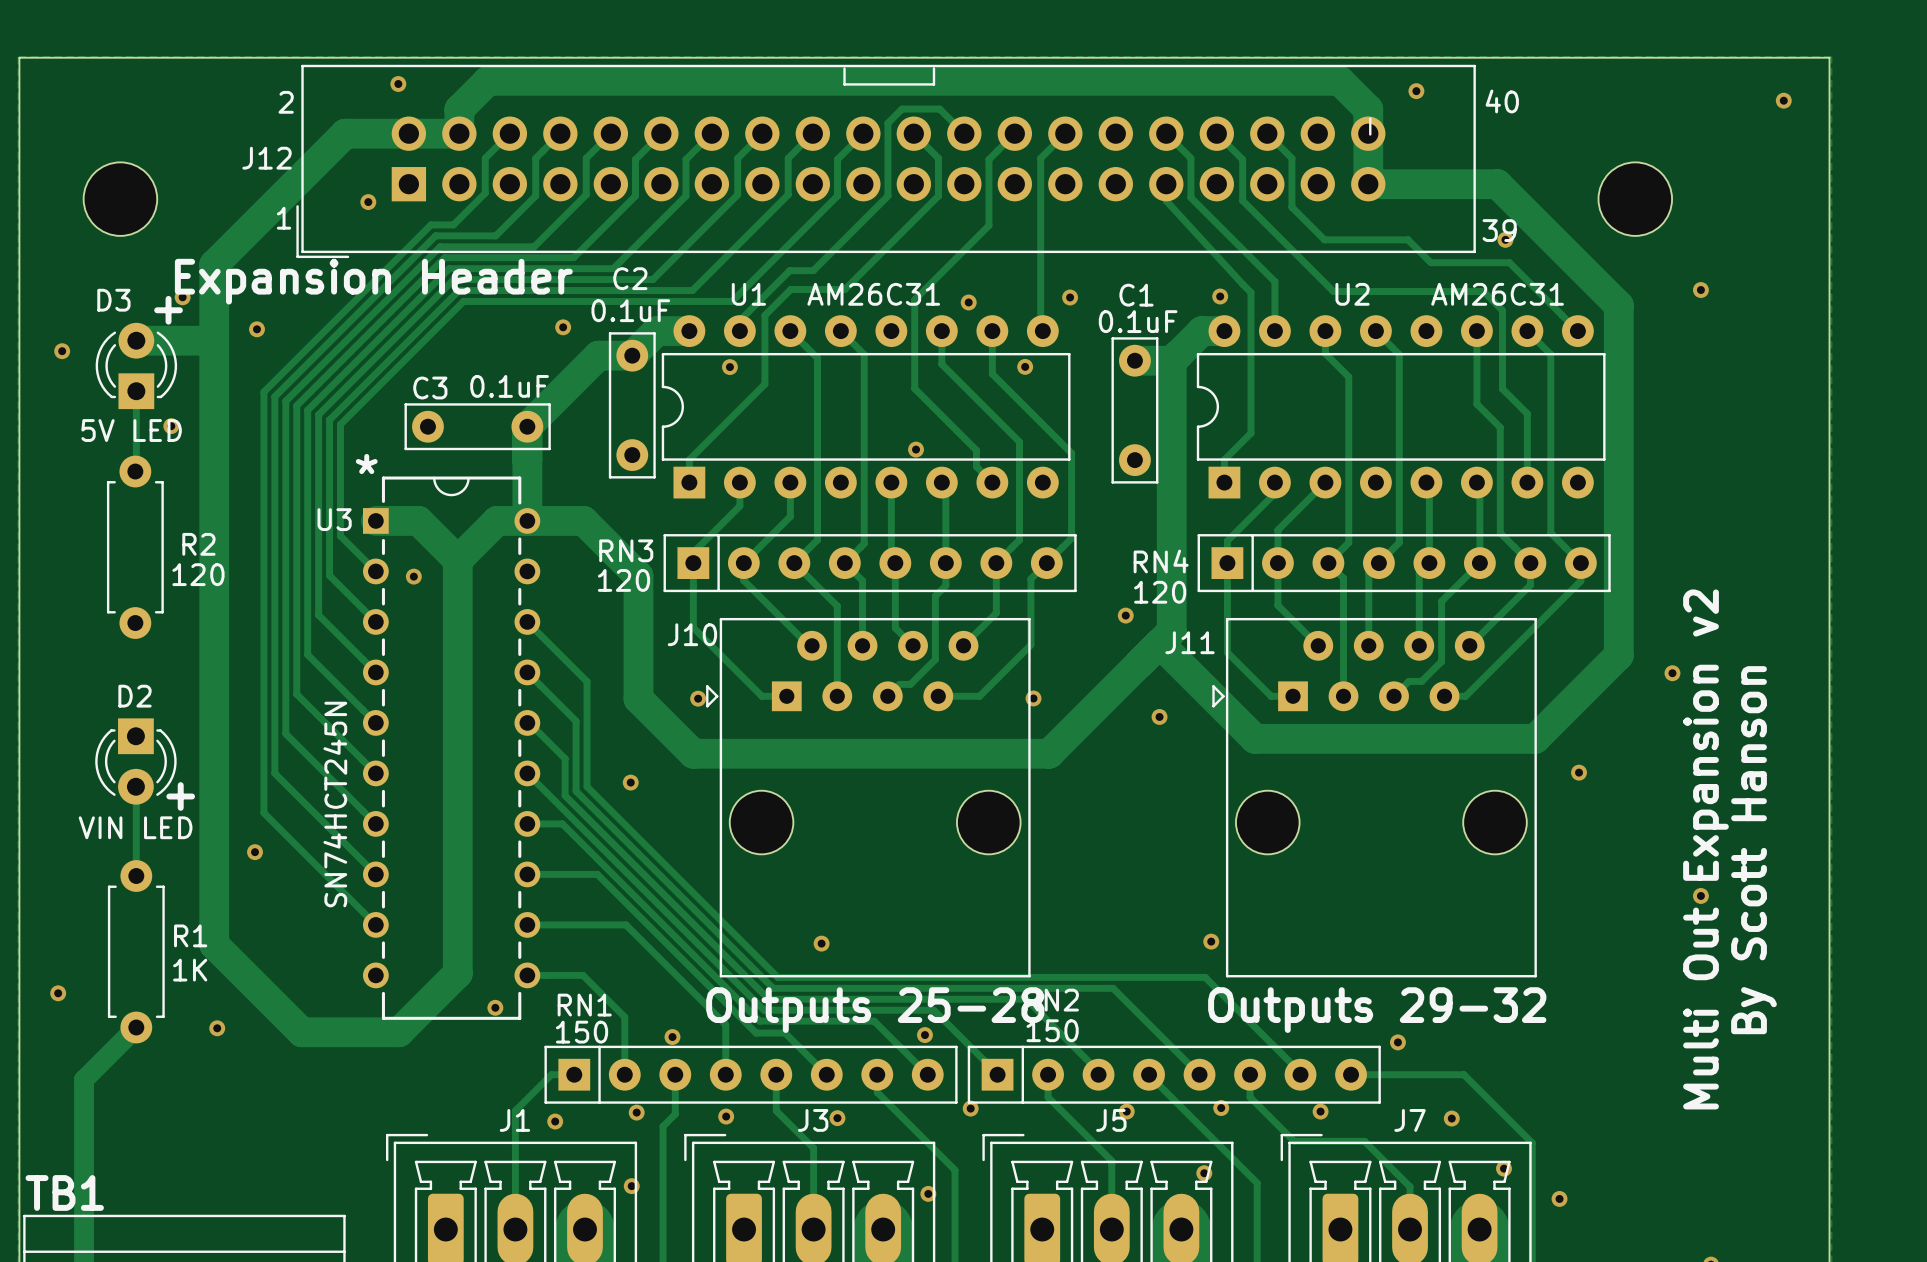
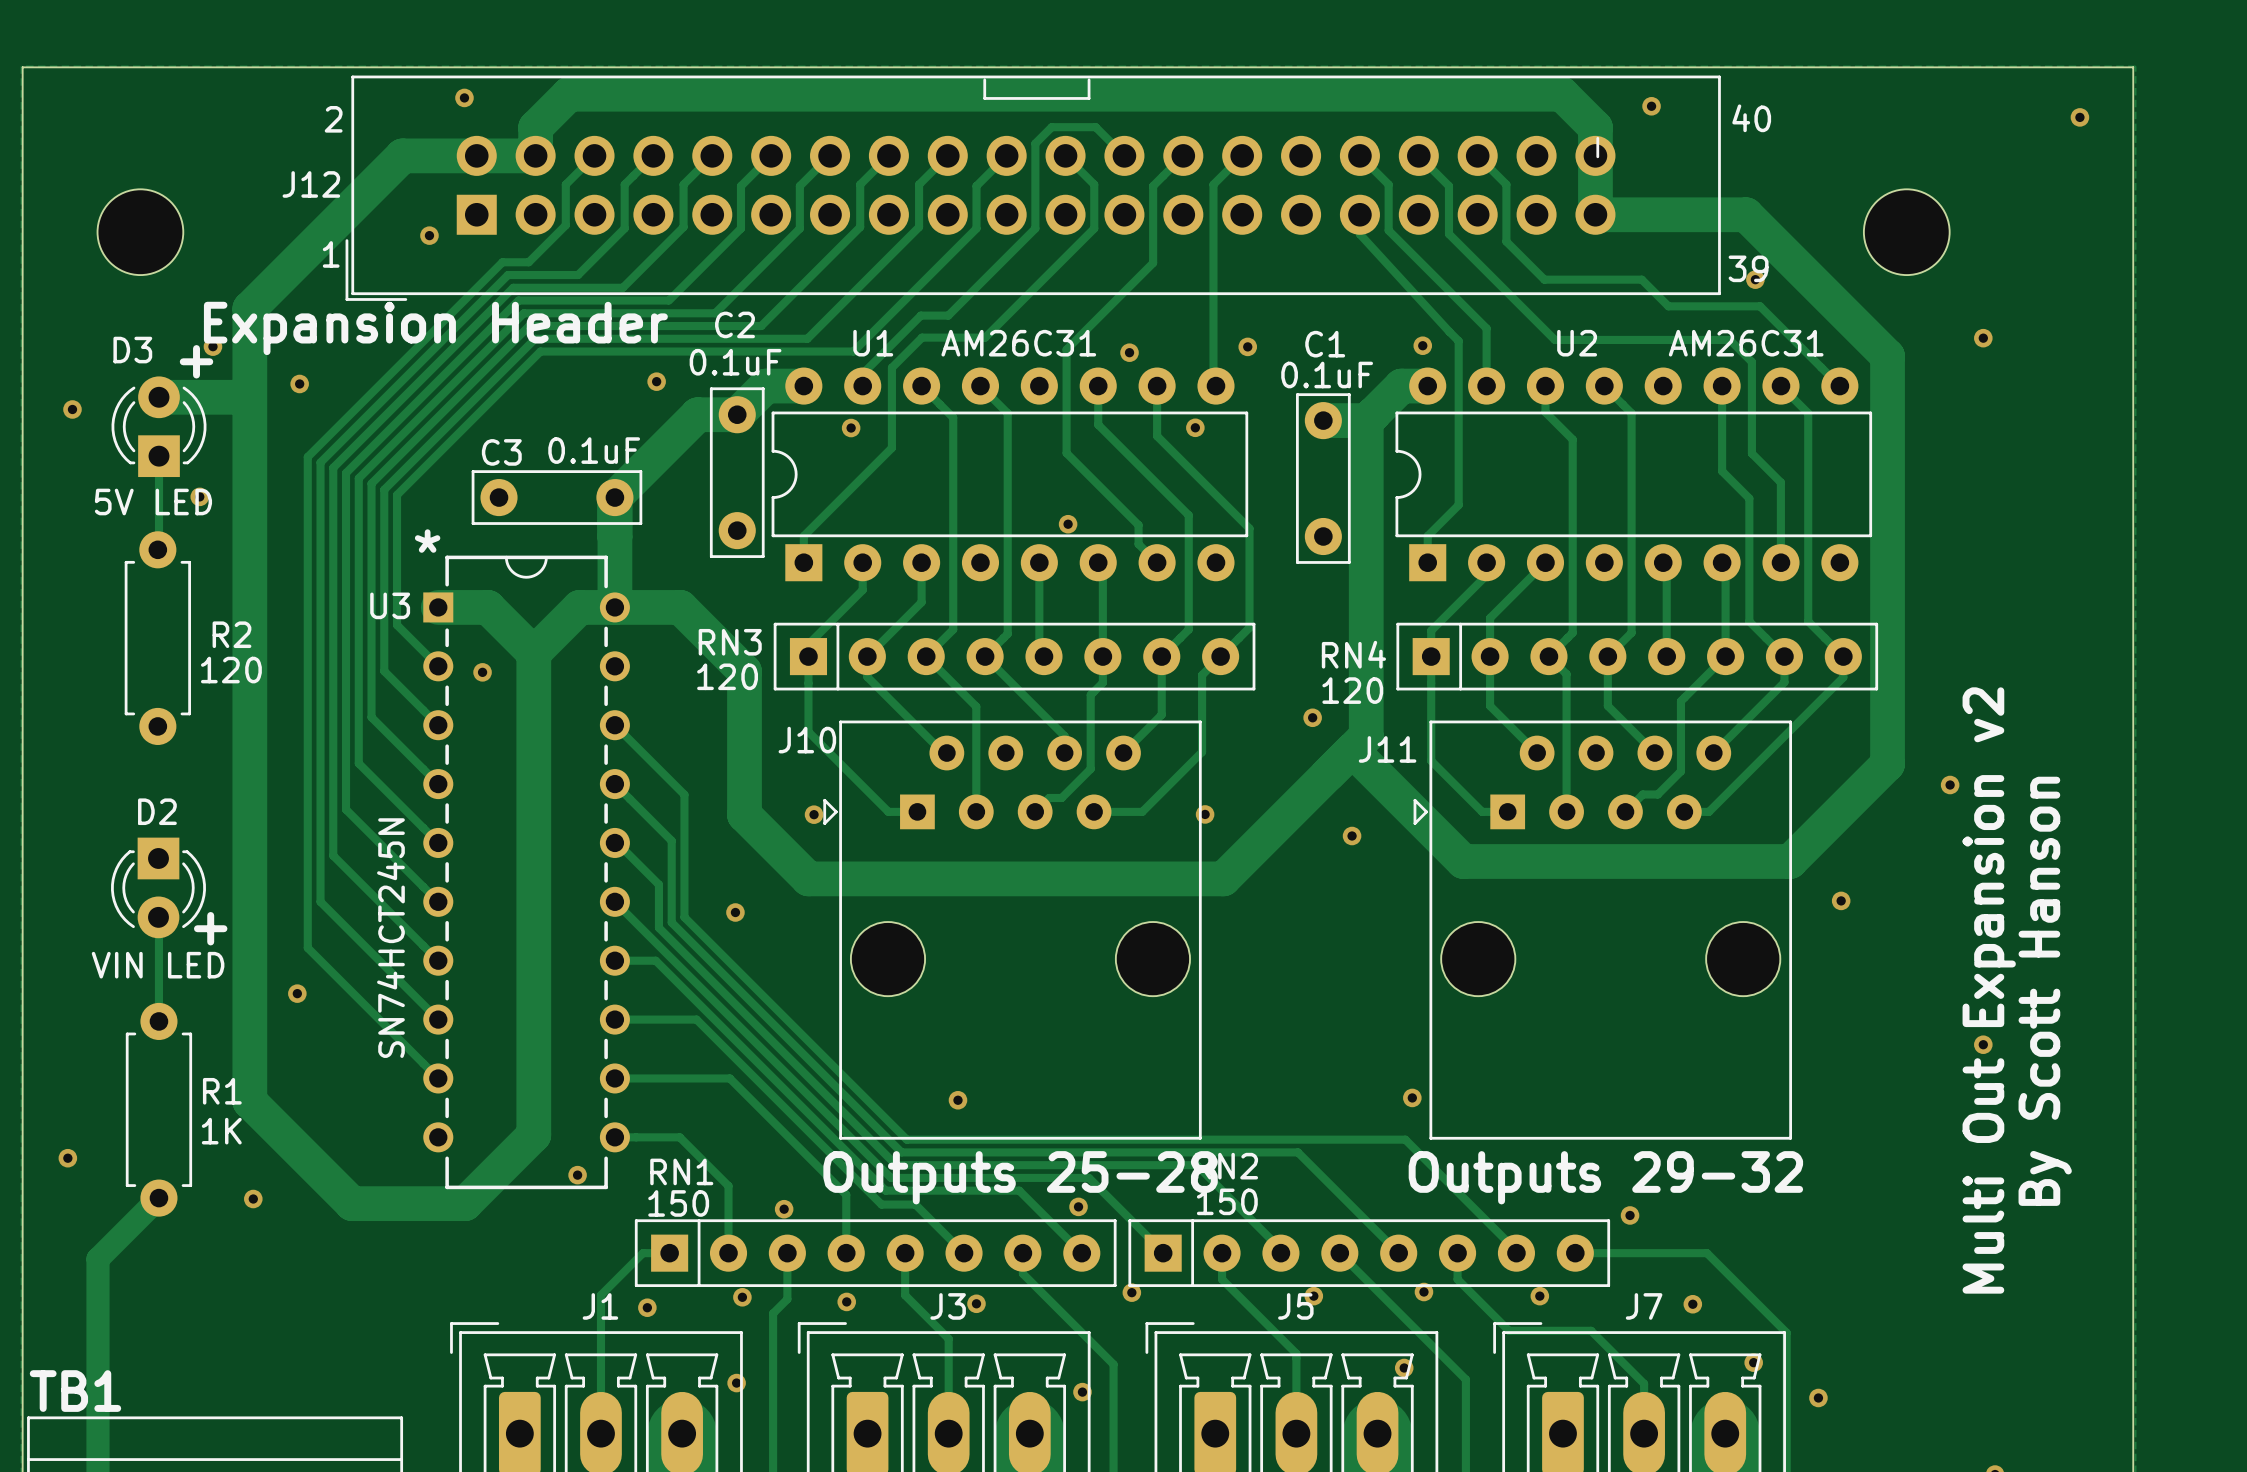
track: (895, 563) (895, 628) (913, 645) -> (1005, 677) (1064, 736) (1064, 753)
track: (1378, 563) (1368, 573) (1368, 645) -> (1607, 656) (1607, 705) (1654, 753)
track: (1429, 563) (1419, 573) (1419, 645) -> none
track: (862, 580) (862, 645) -> none

